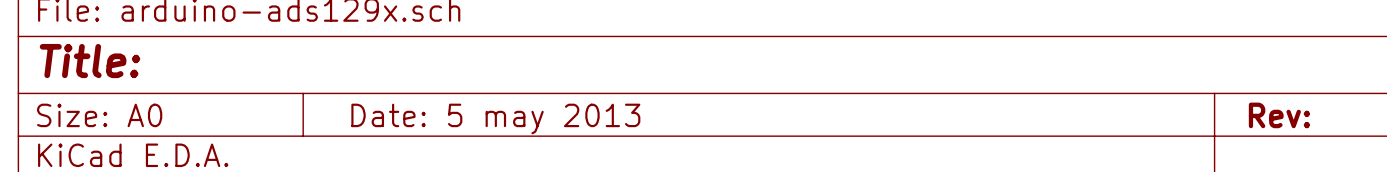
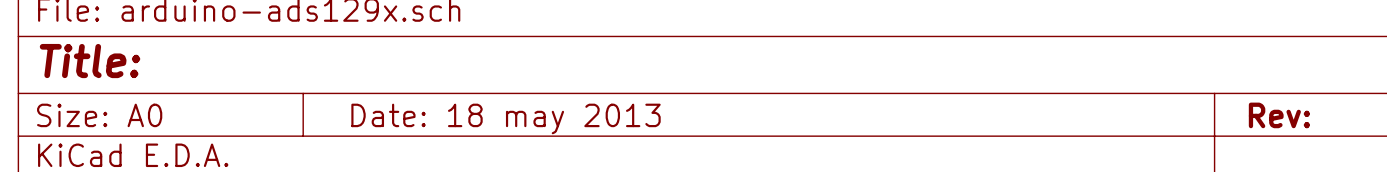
title block: Date: 5 may 2013 (495, 118) -> Date: 18 may 2013 (506, 118)

